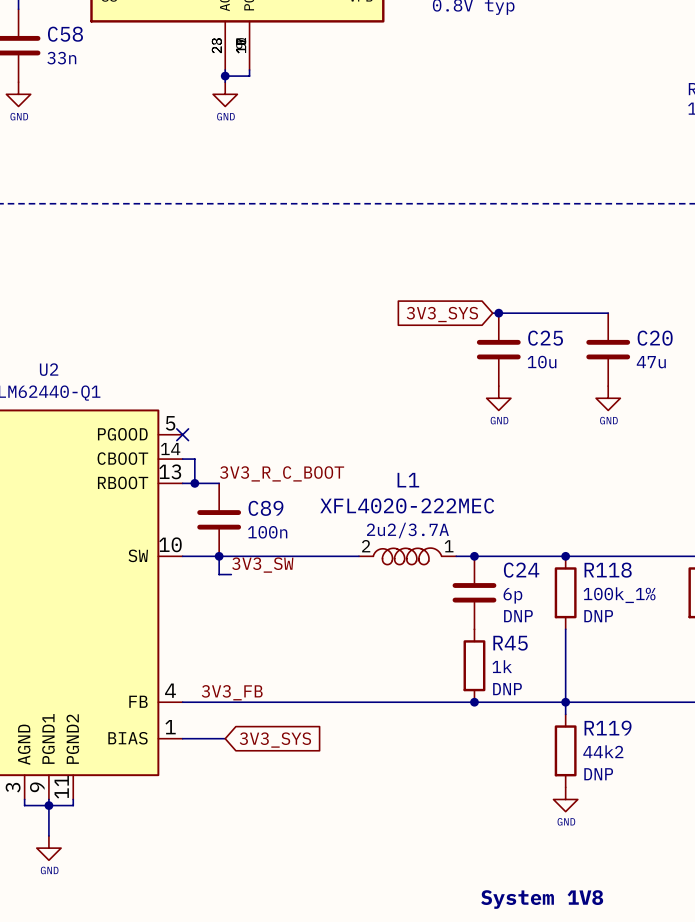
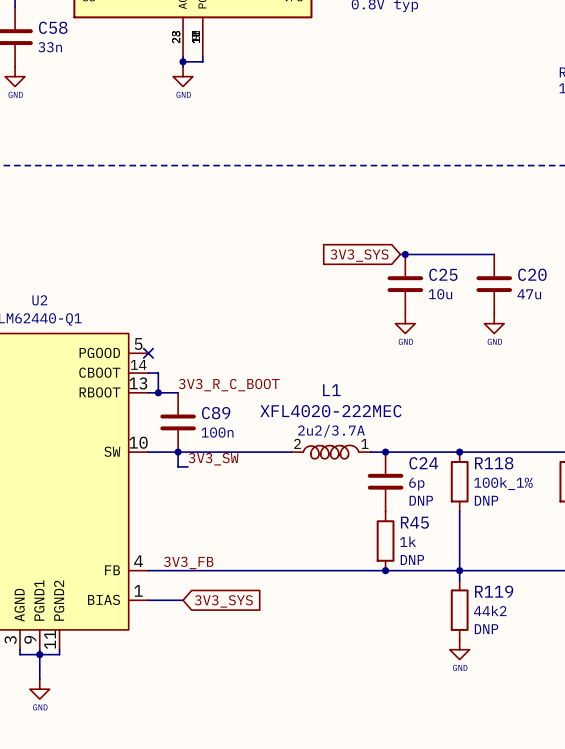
text: System 1V8 (542, 899) -> none

